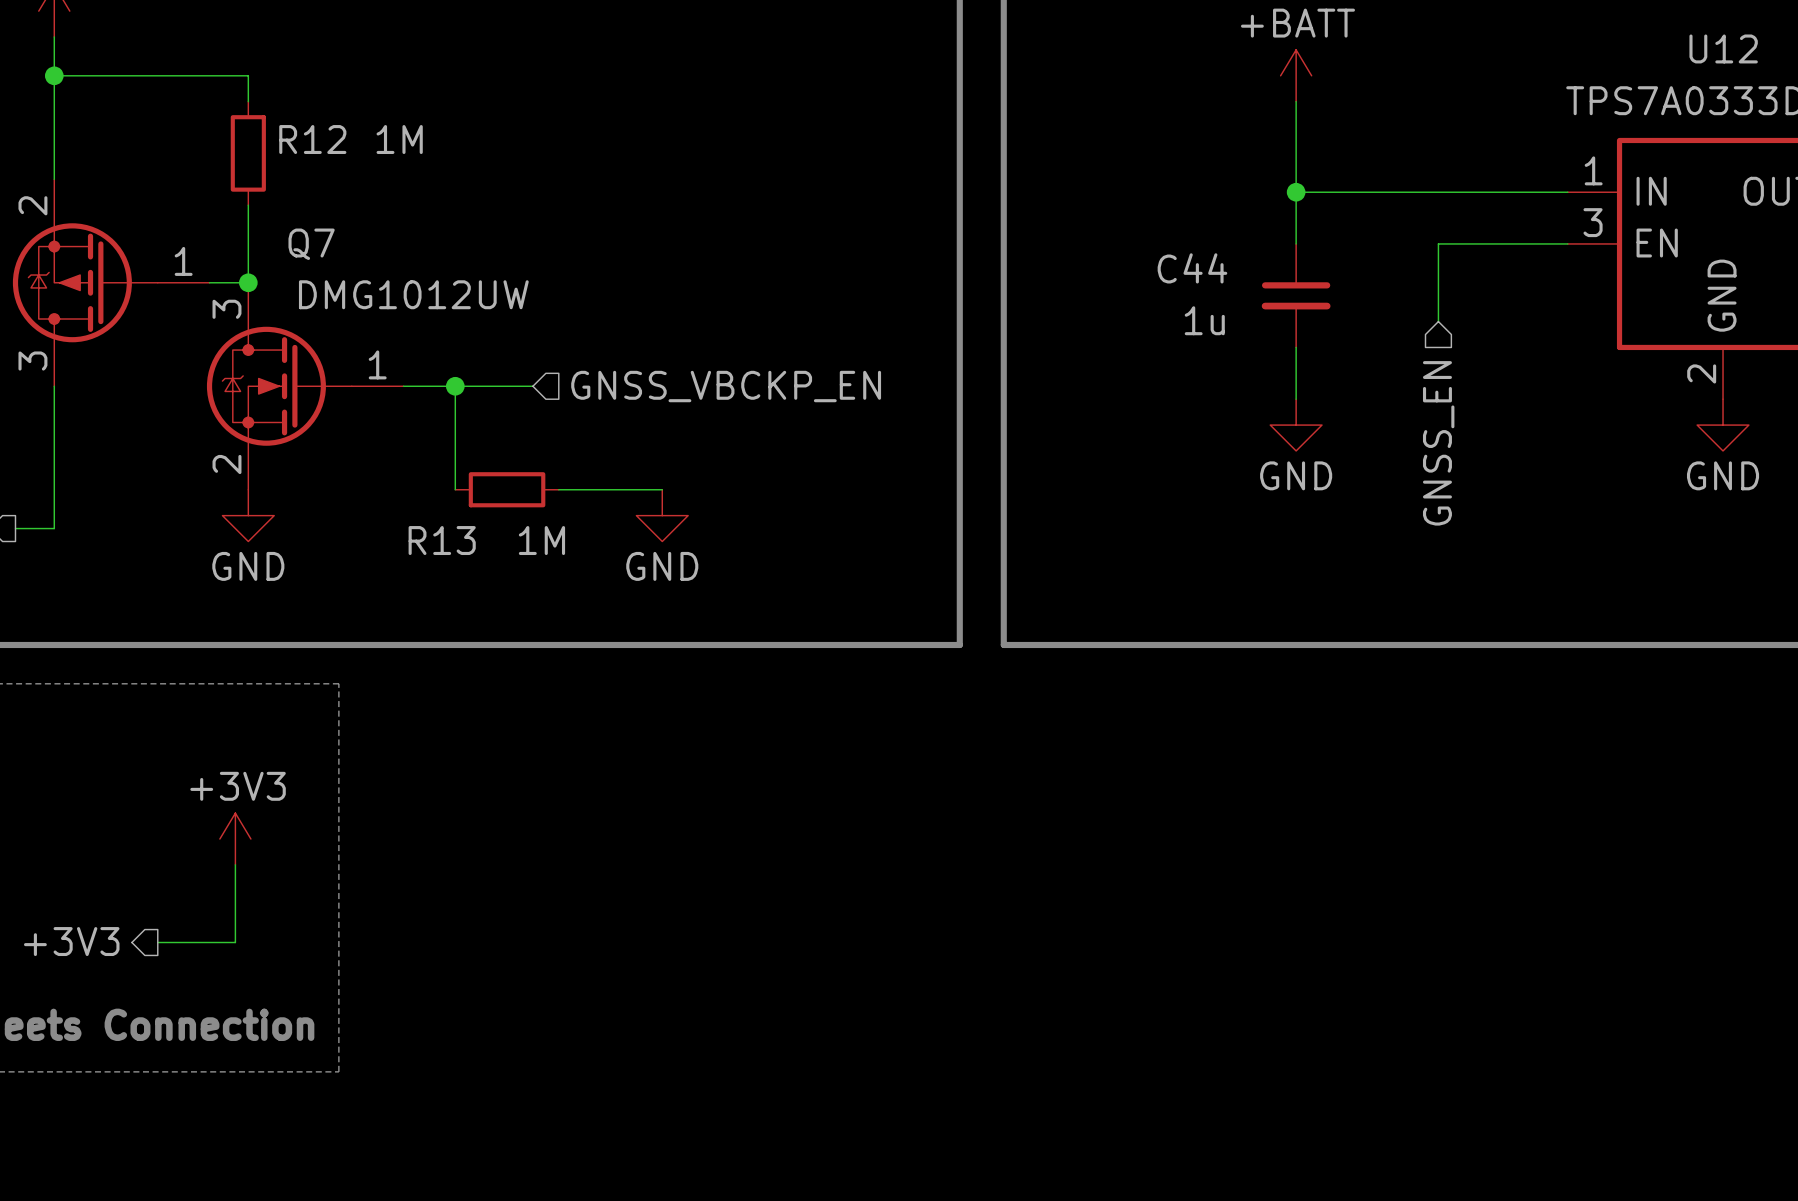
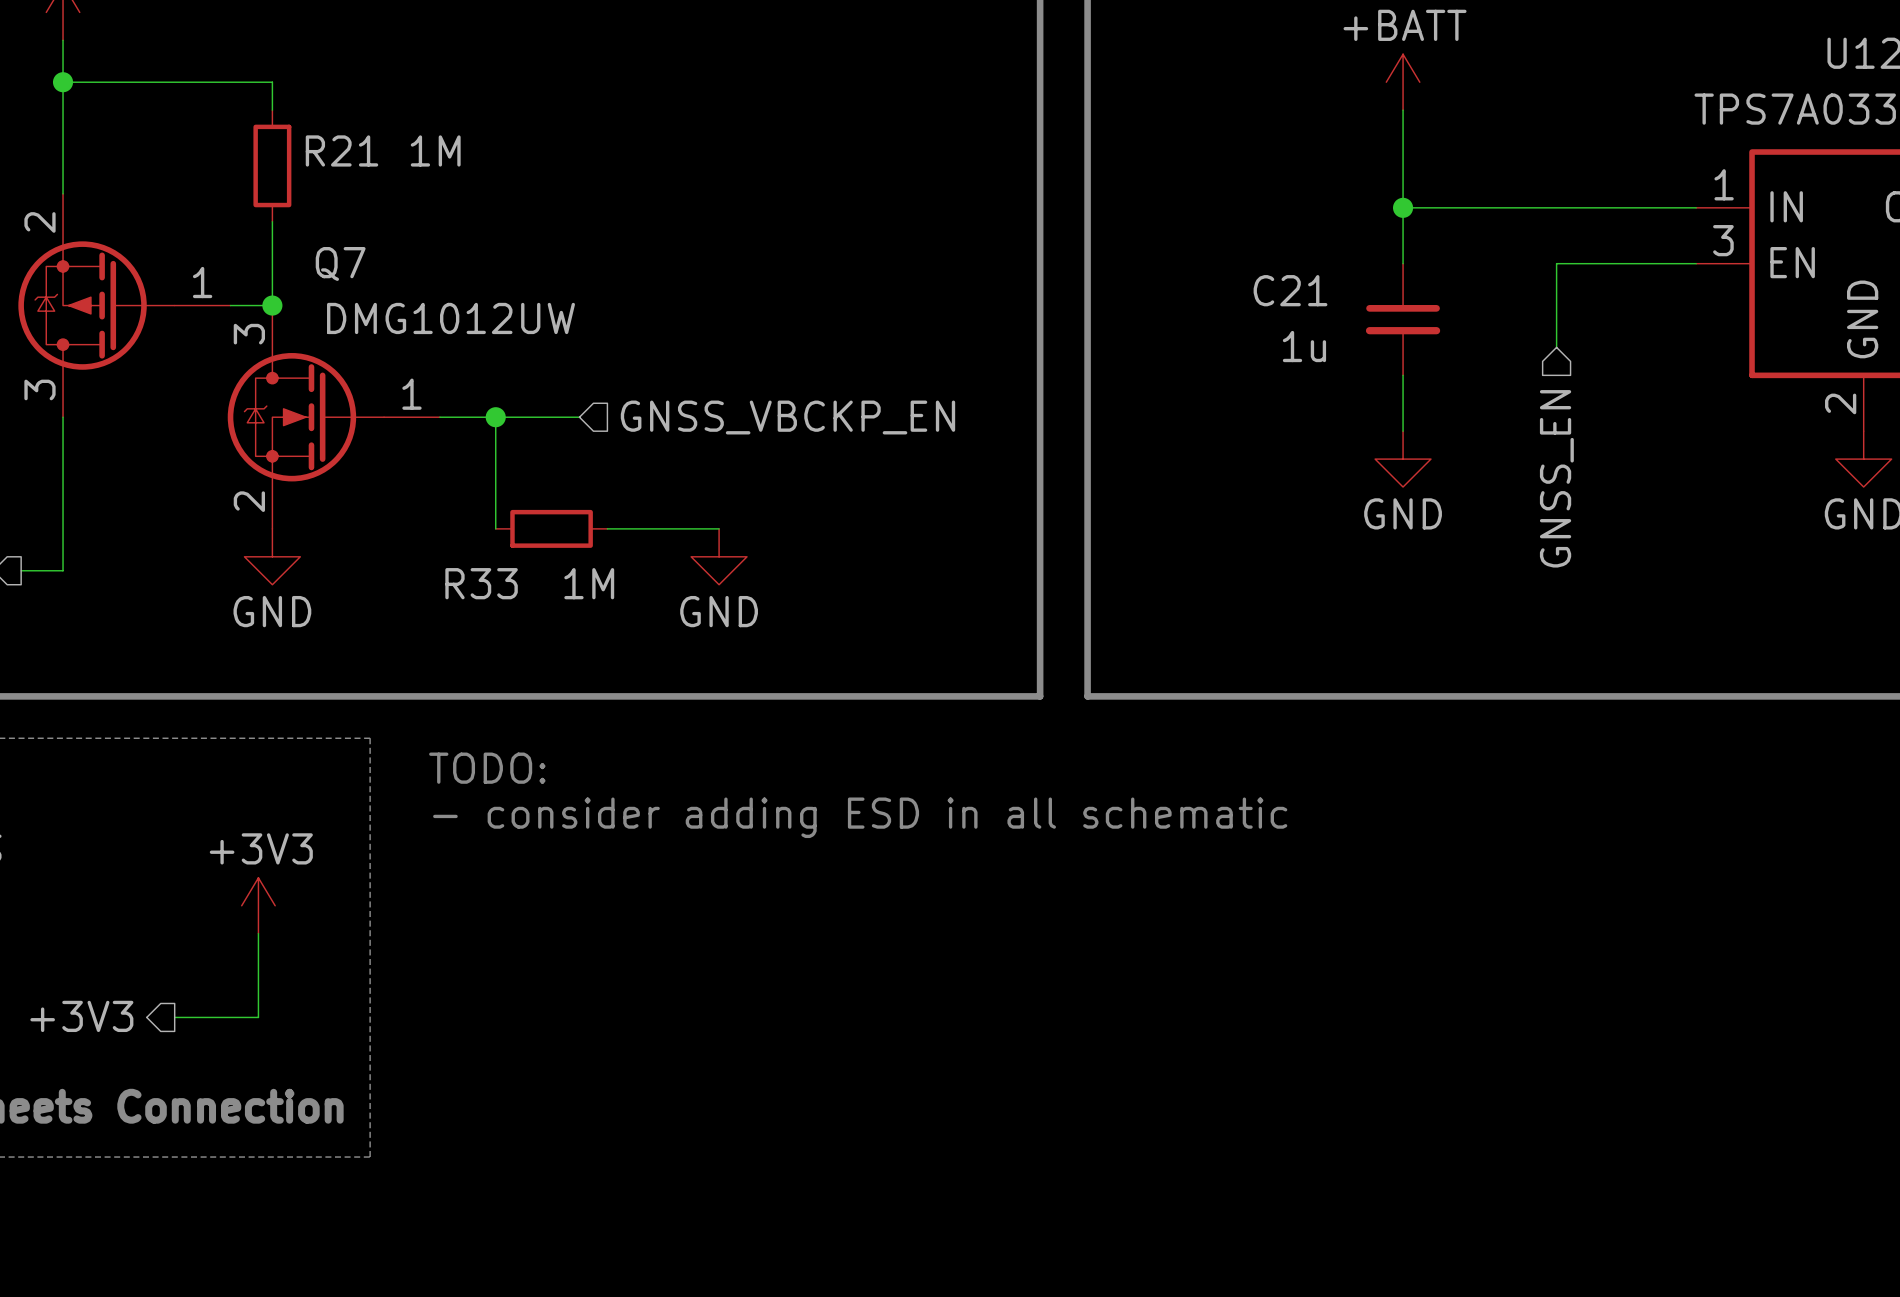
R12 name: R12 (312, 139) -> R21 (341, 150)
C44 name: C44 (1192, 268) -> C21 (1290, 290)
R13 name: R13 (442, 540) -> R33 (481, 583)
text: none -> TODO: (487, 768)
text: none -> - consider adding ESD in all schematic (860, 817)

